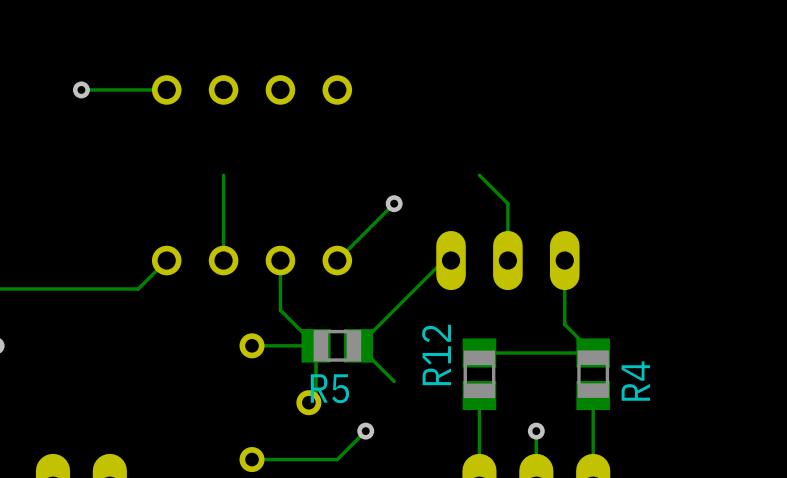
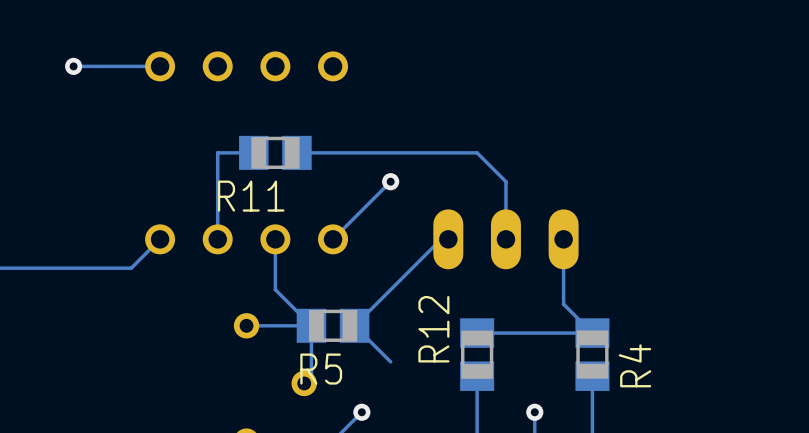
track: none -> (253, 152) (217, 152)
R11: none -> (275, 152)
track: none -> (477, 152) (296, 152)

